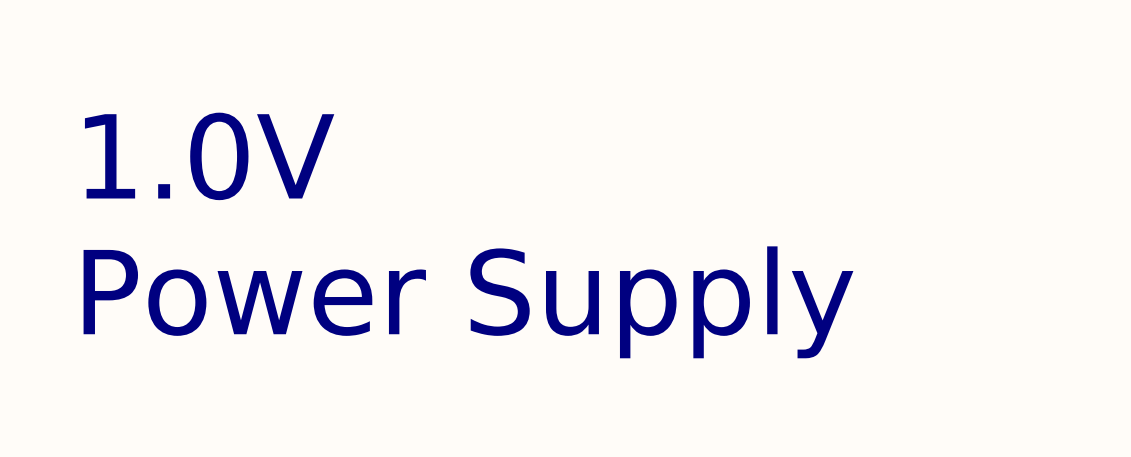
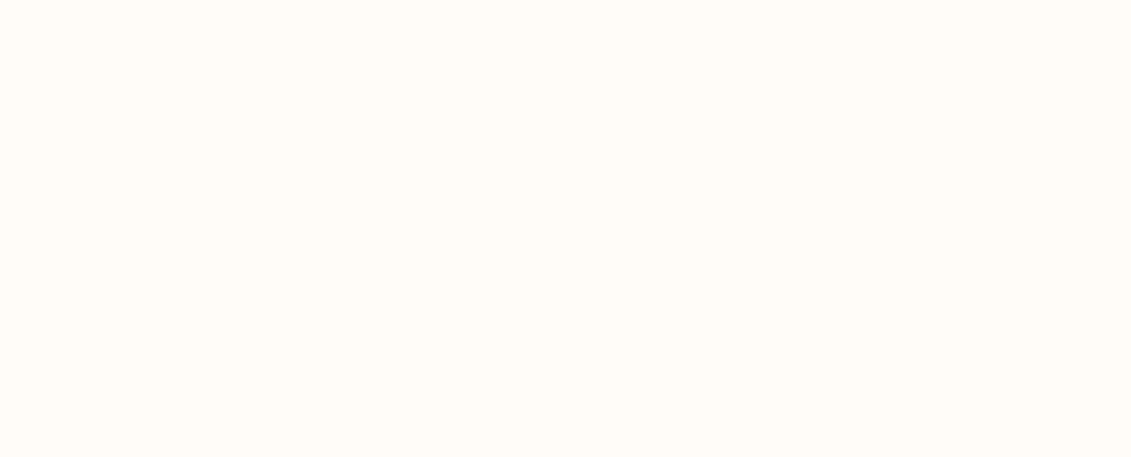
text: 1.0V (209, 156) -> none
text: Power Supply (468, 302) -> none

